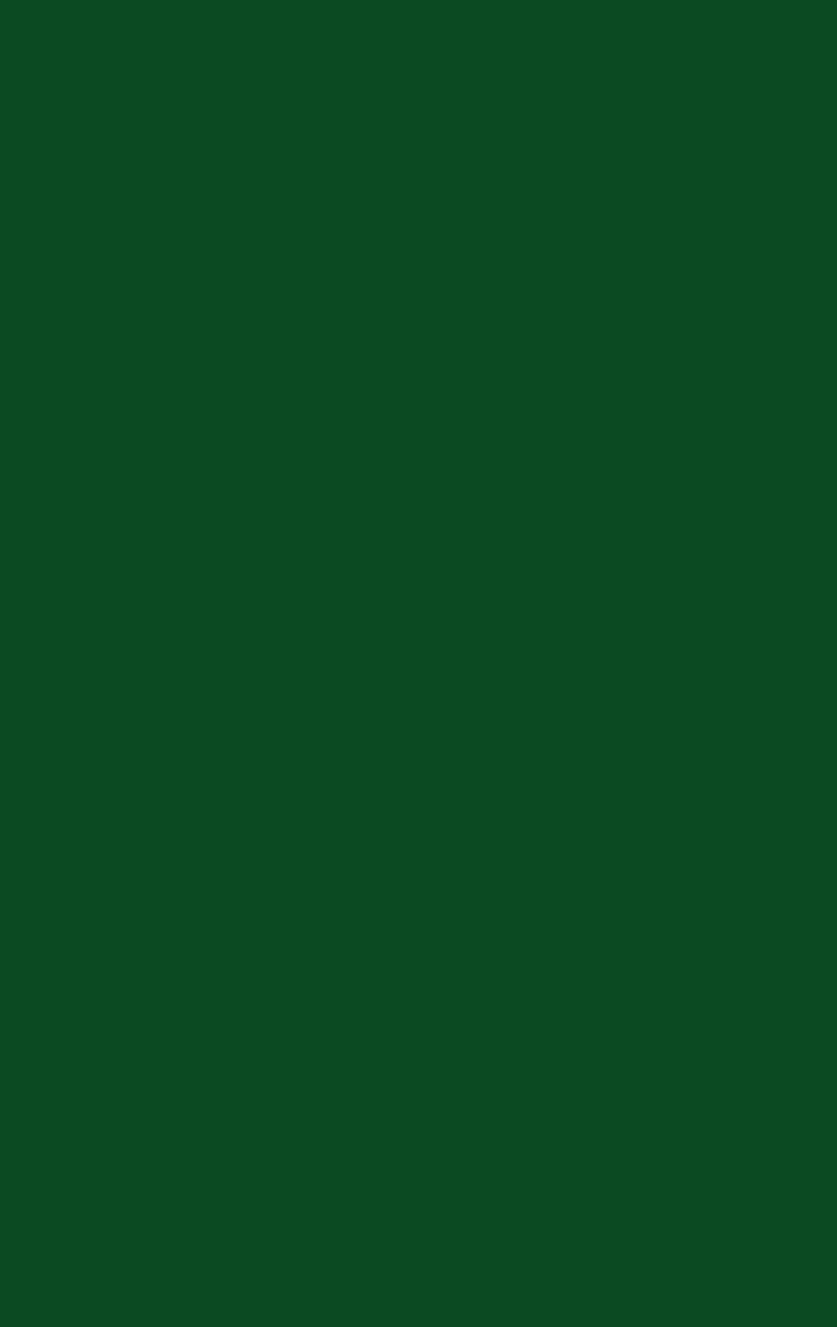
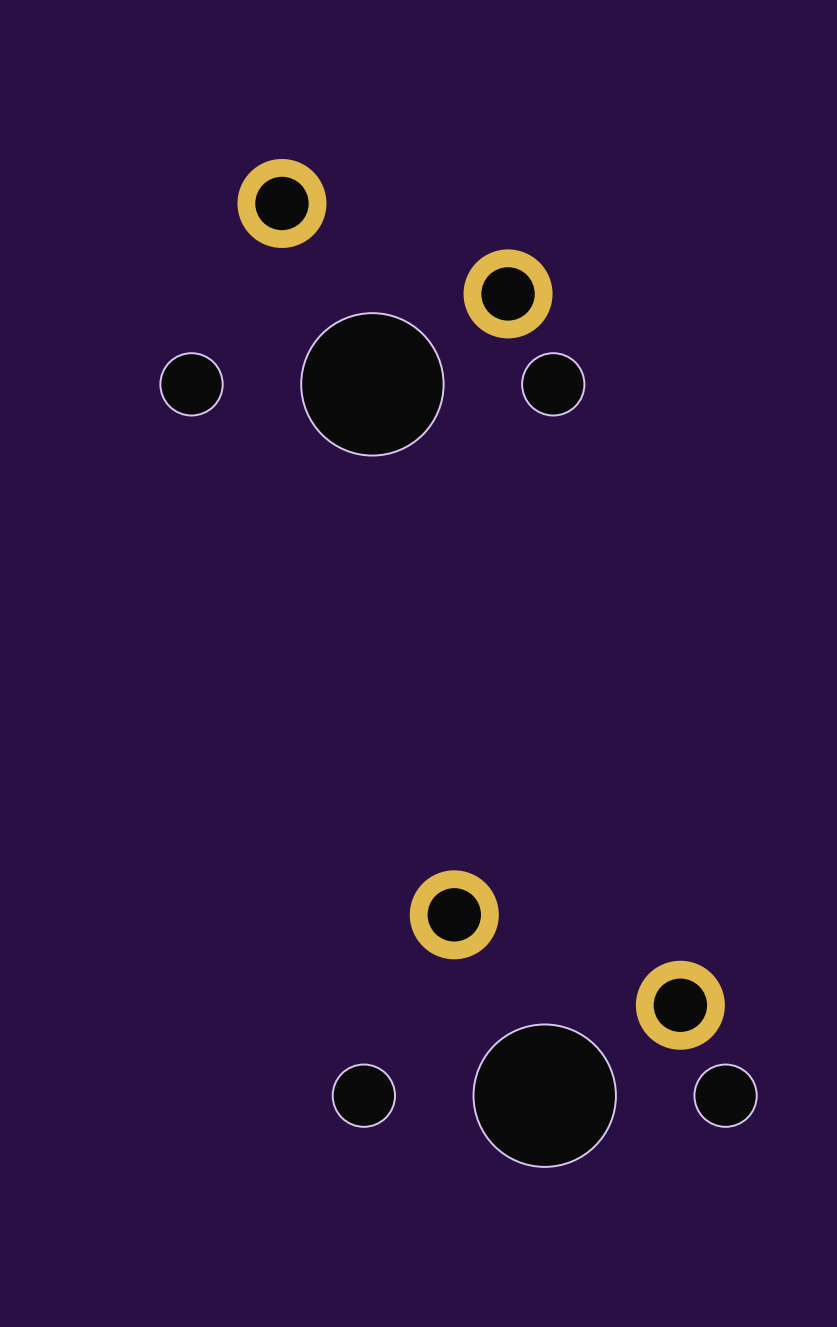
part: none -> (372, 307)
part: none -> (544, 1018)

